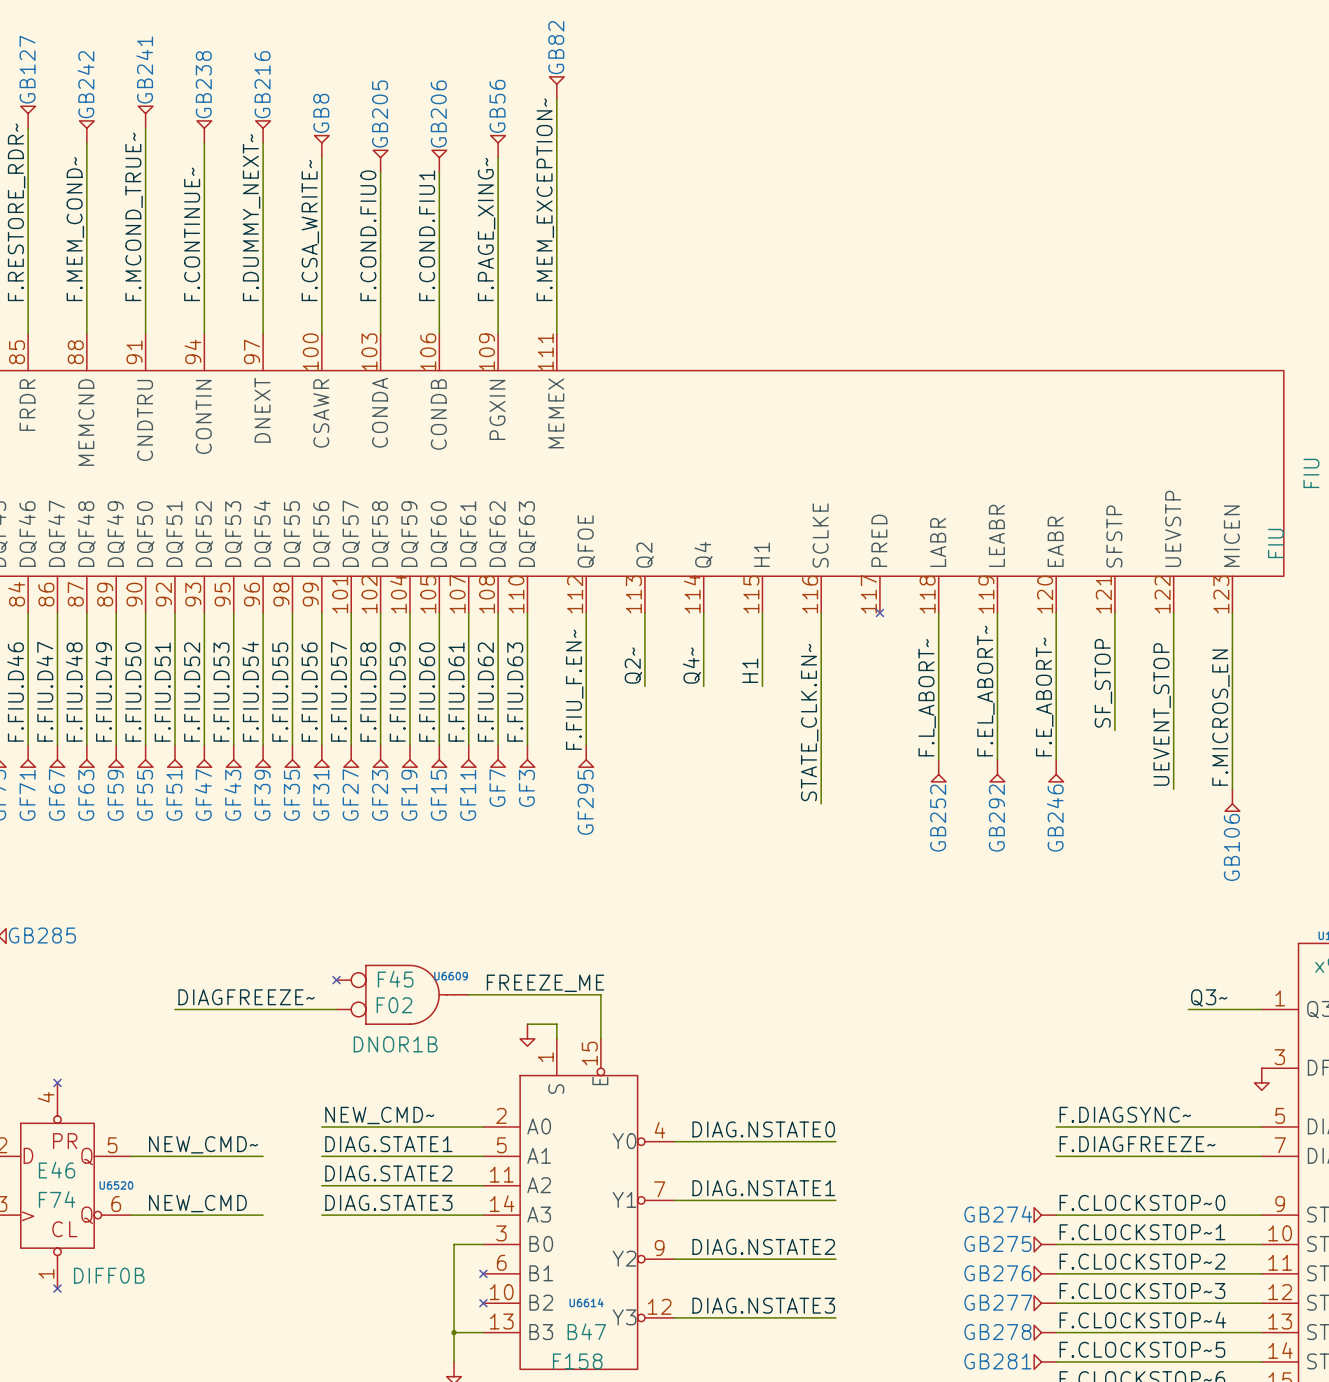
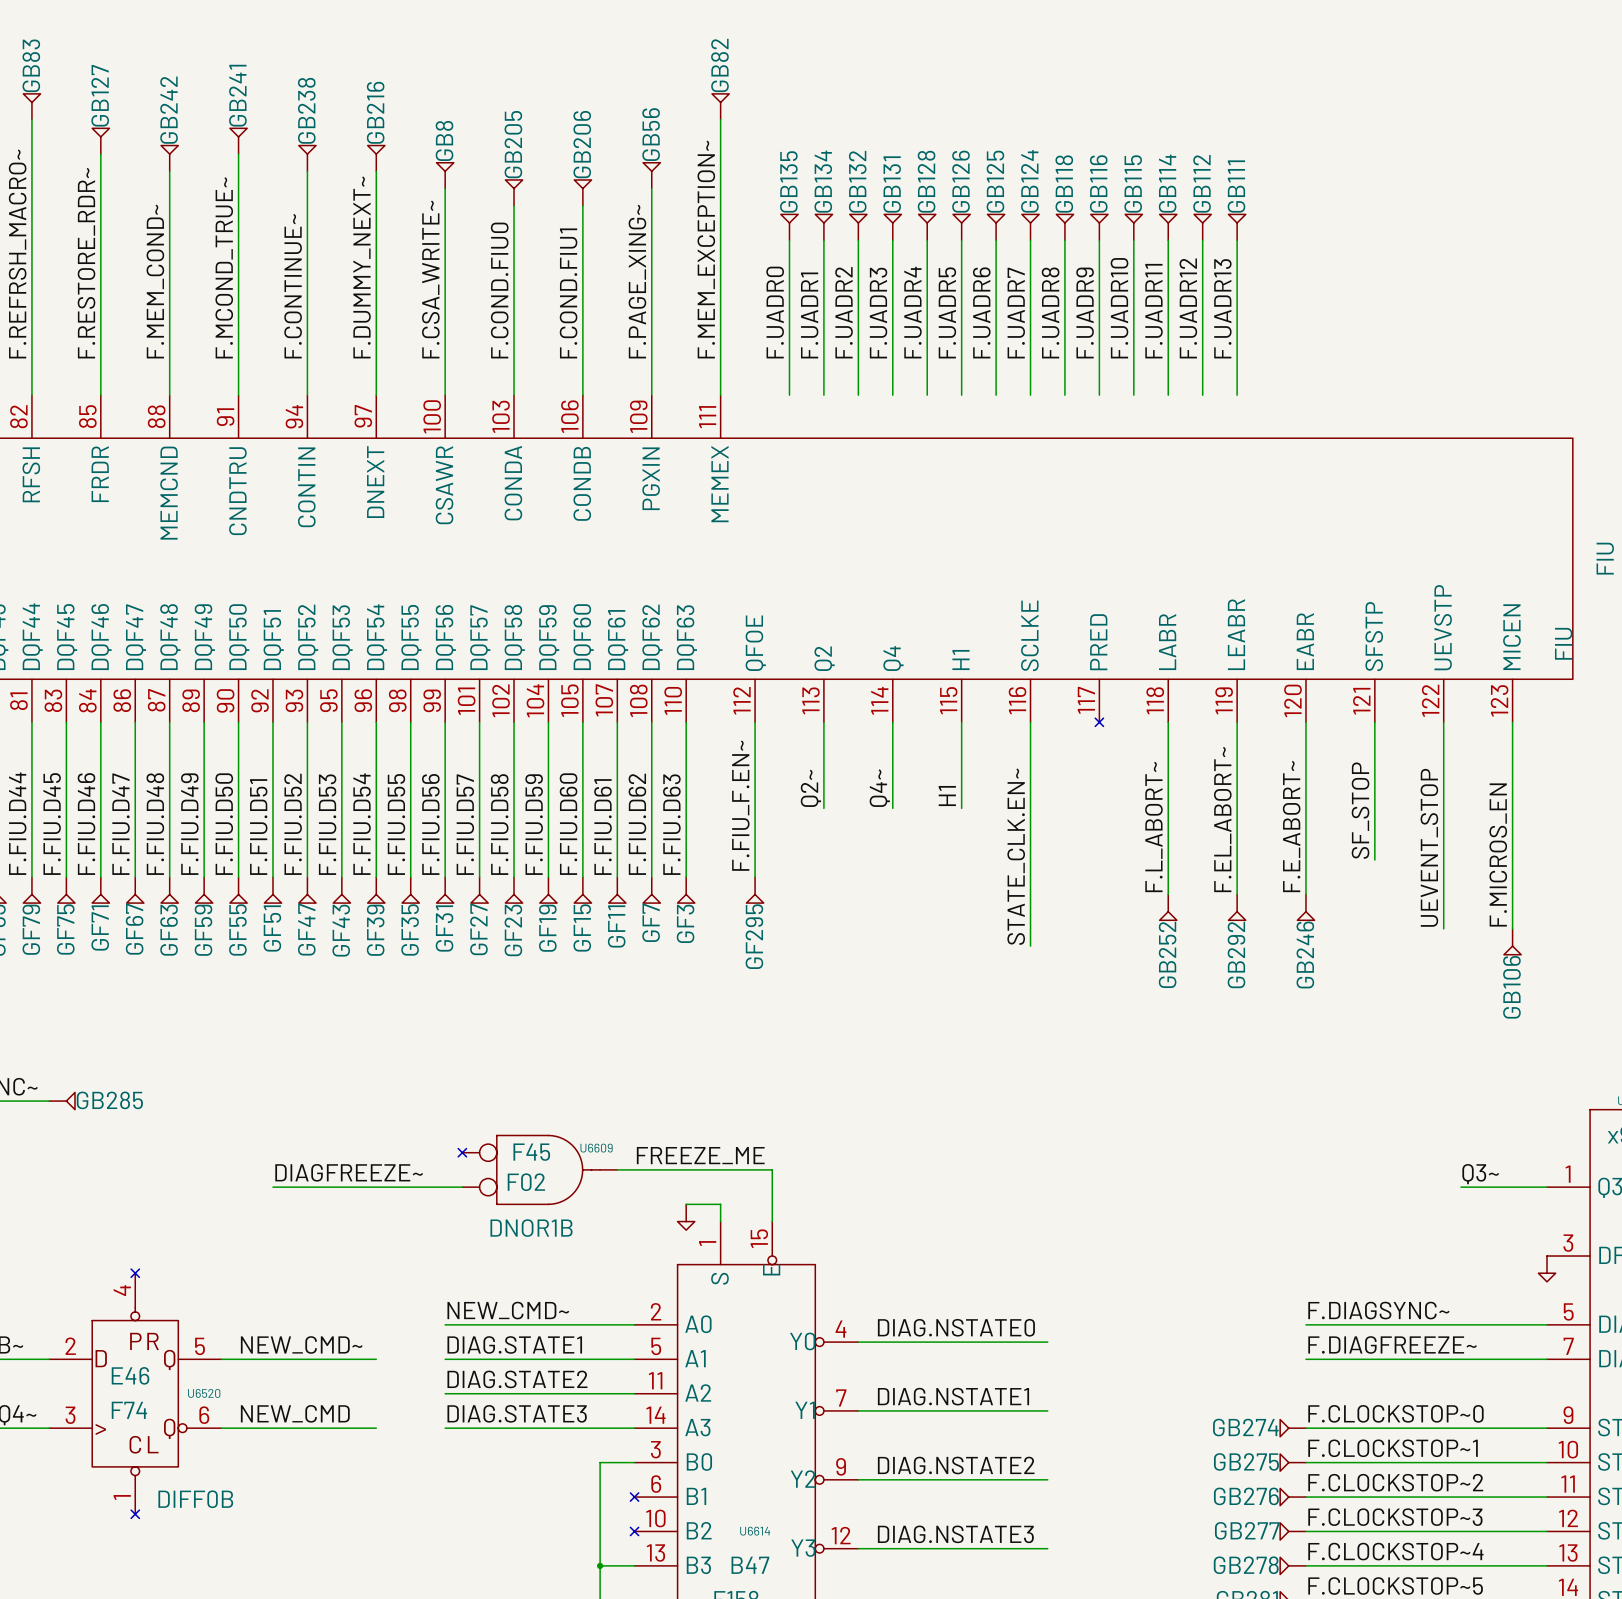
GB135: none -> (789, 227)
GB134: none -> (823, 227)
GB132: none -> (858, 227)
GB131: none -> (892, 227)
GB128: none -> (927, 227)
GB126: none -> (961, 227)
GB125: none -> (996, 227)
GB124: none -> (1030, 227)
GB118: none -> (1064, 227)
GB116: none -> (1099, 227)
GB115: none -> (1133, 227)
GB114: none -> (1168, 227)
GB112: none -> (1202, 227)
GB111: none -> (1237, 227)
wire: none -> (789, 240) (789, 395)
wire: none -> (823, 240) (823, 395)
wire: none -> (858, 240) (858, 395)
wire: none -> (892, 240) (892, 395)
wire: none -> (927, 240) (927, 395)
wire: none -> (961, 240) (961, 395)
wire: none -> (996, 240) (996, 395)
wire: none -> (1030, 240) (1030, 395)
wire: none -> (1064, 240) (1064, 395)
wire: none -> (1099, 240) (1099, 395)
wire: none -> (1133, 240) (1133, 395)
wire: none -> (1168, 240) (1168, 395)
wire: none -> (1202, 240) (1202, 395)
wire: none -> (1237, 240) (1237, 395)
label: none -> F.UADR10 (1119, 308)
label: none -> F.UADR11 (1154, 311)
label: none -> F.UADR12 (1188, 308)
label: none -> F.UADR13 (1222, 308)
label: none -> F.UADR4 (912, 312)
label: none -> F.UADR7 (1016, 313)
label: none -> F.UADR0 (775, 312)
label: none -> F.UADR1 (809, 315)
label: none -> F.UADR2 (844, 312)
label: none -> F.UADR3 (878, 313)
label: none -> F.UADR5 (947, 312)
label: none -> F.UADR6 (981, 312)
label: none -> F.UADR8 (1050, 312)
label: none -> F.UADR9 (1085, 313)

